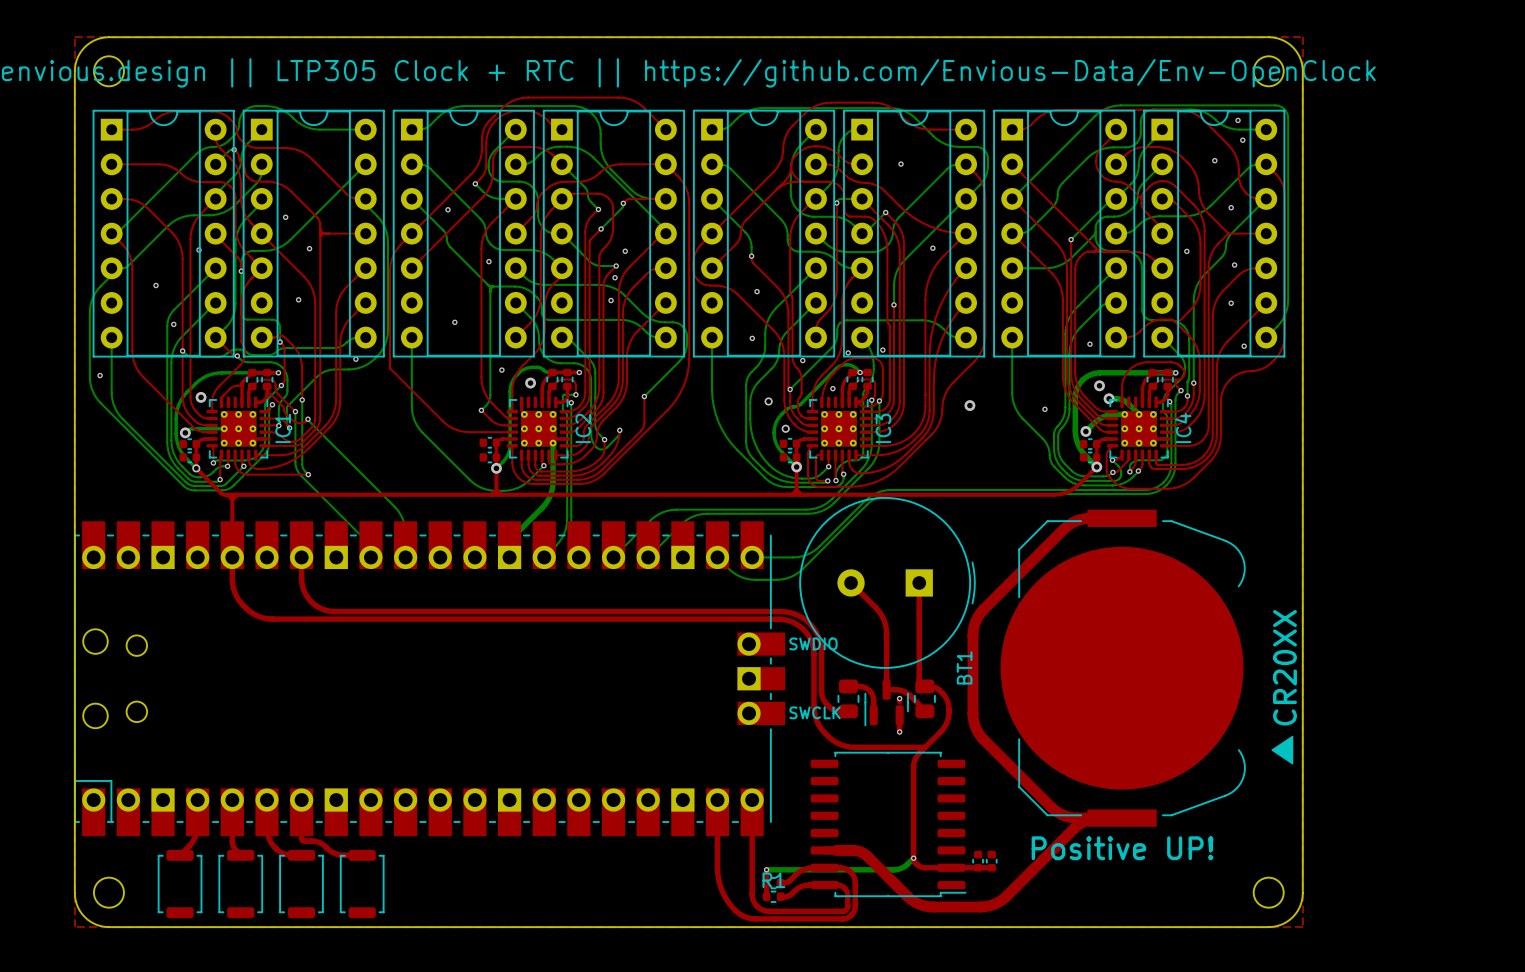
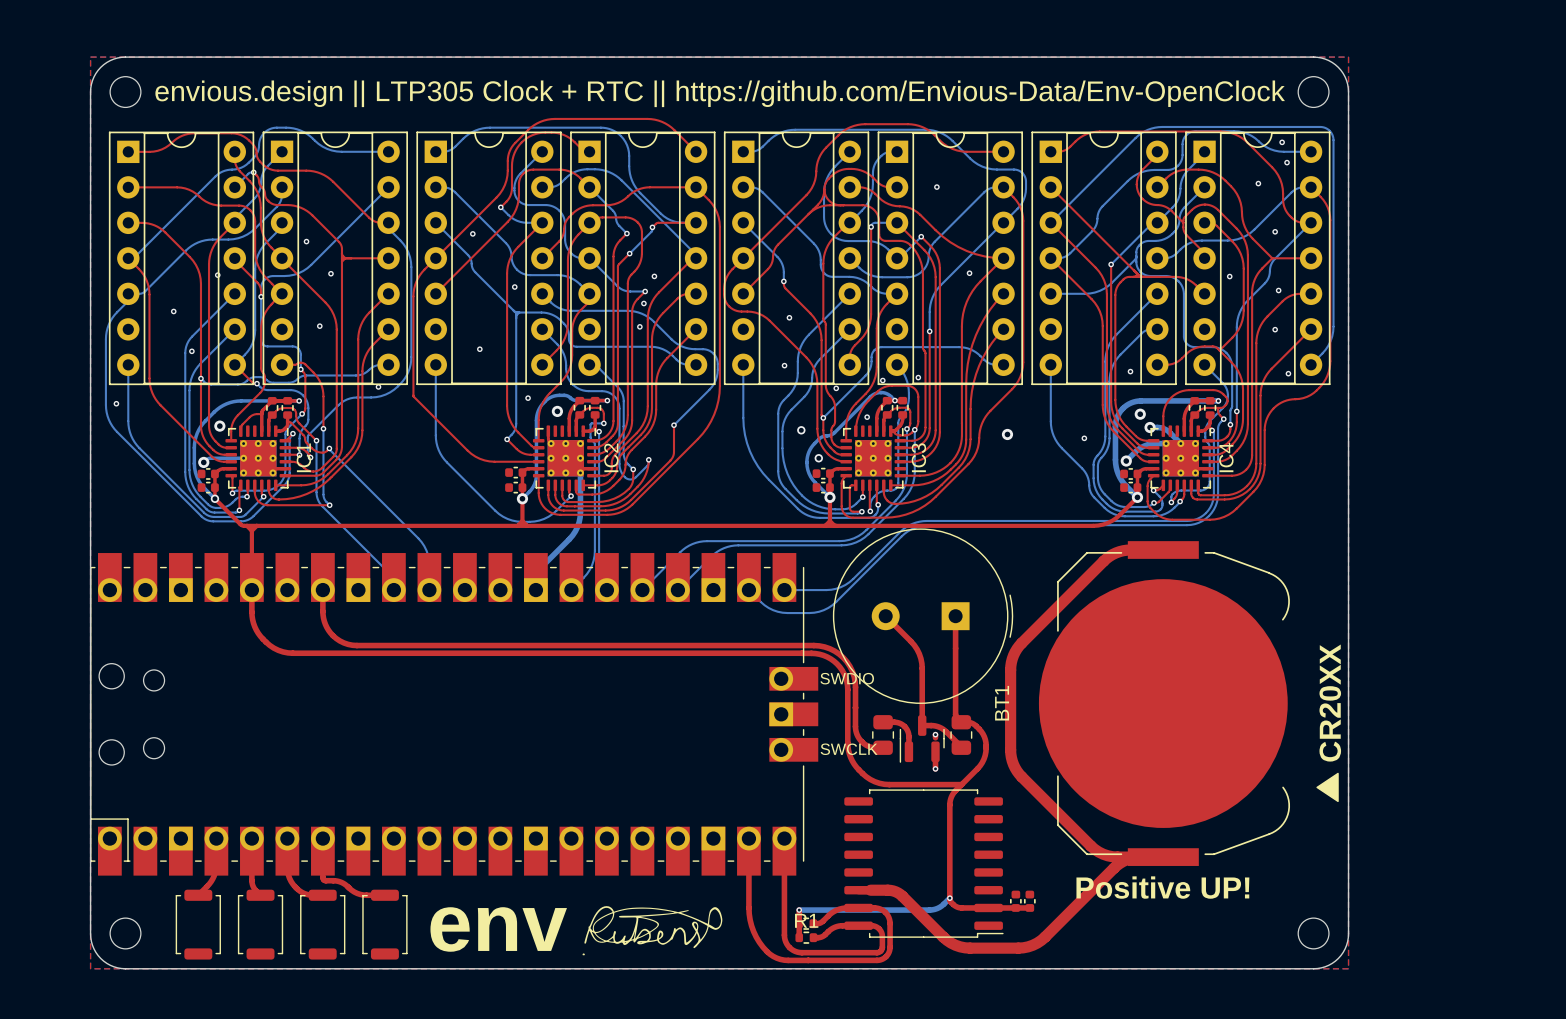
drawing: none -> [582, 906, 723, 956]
text: none -> env (498, 929)

